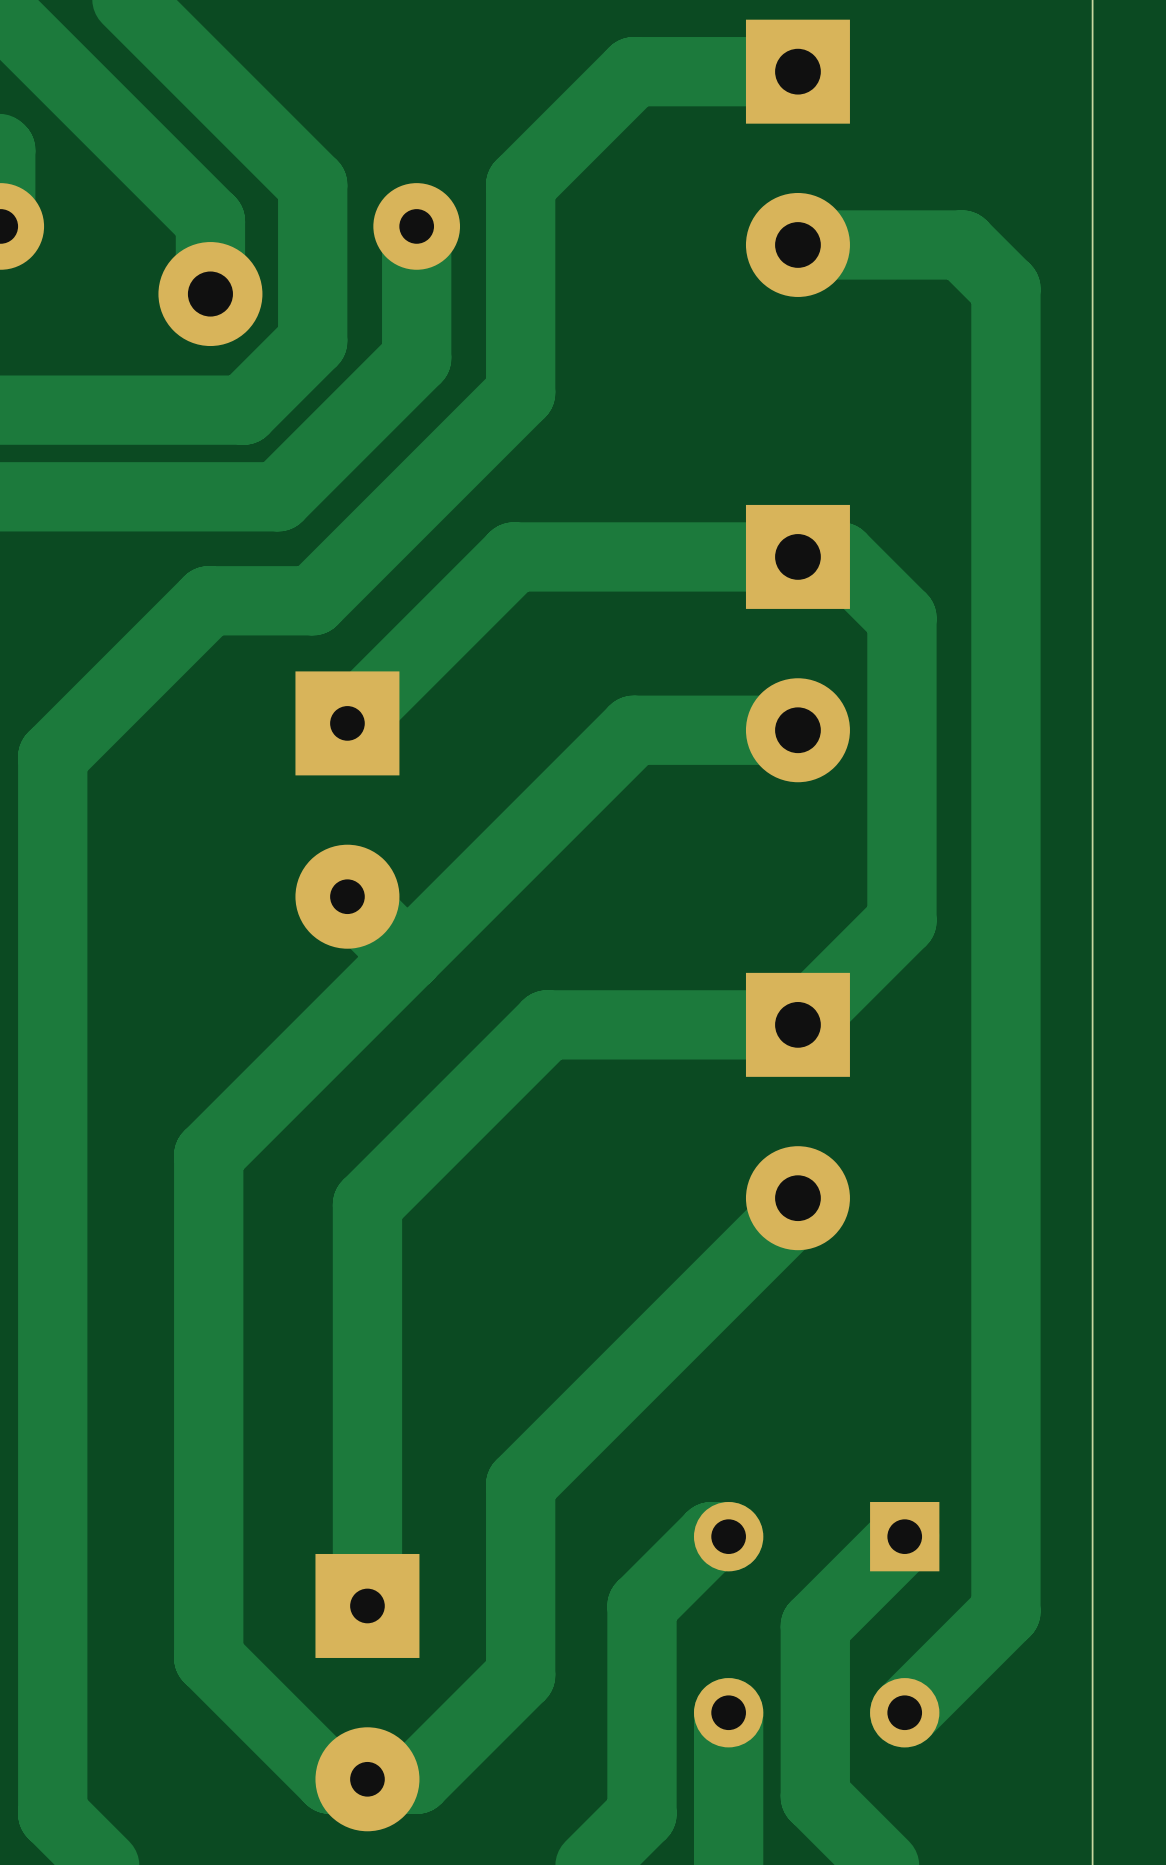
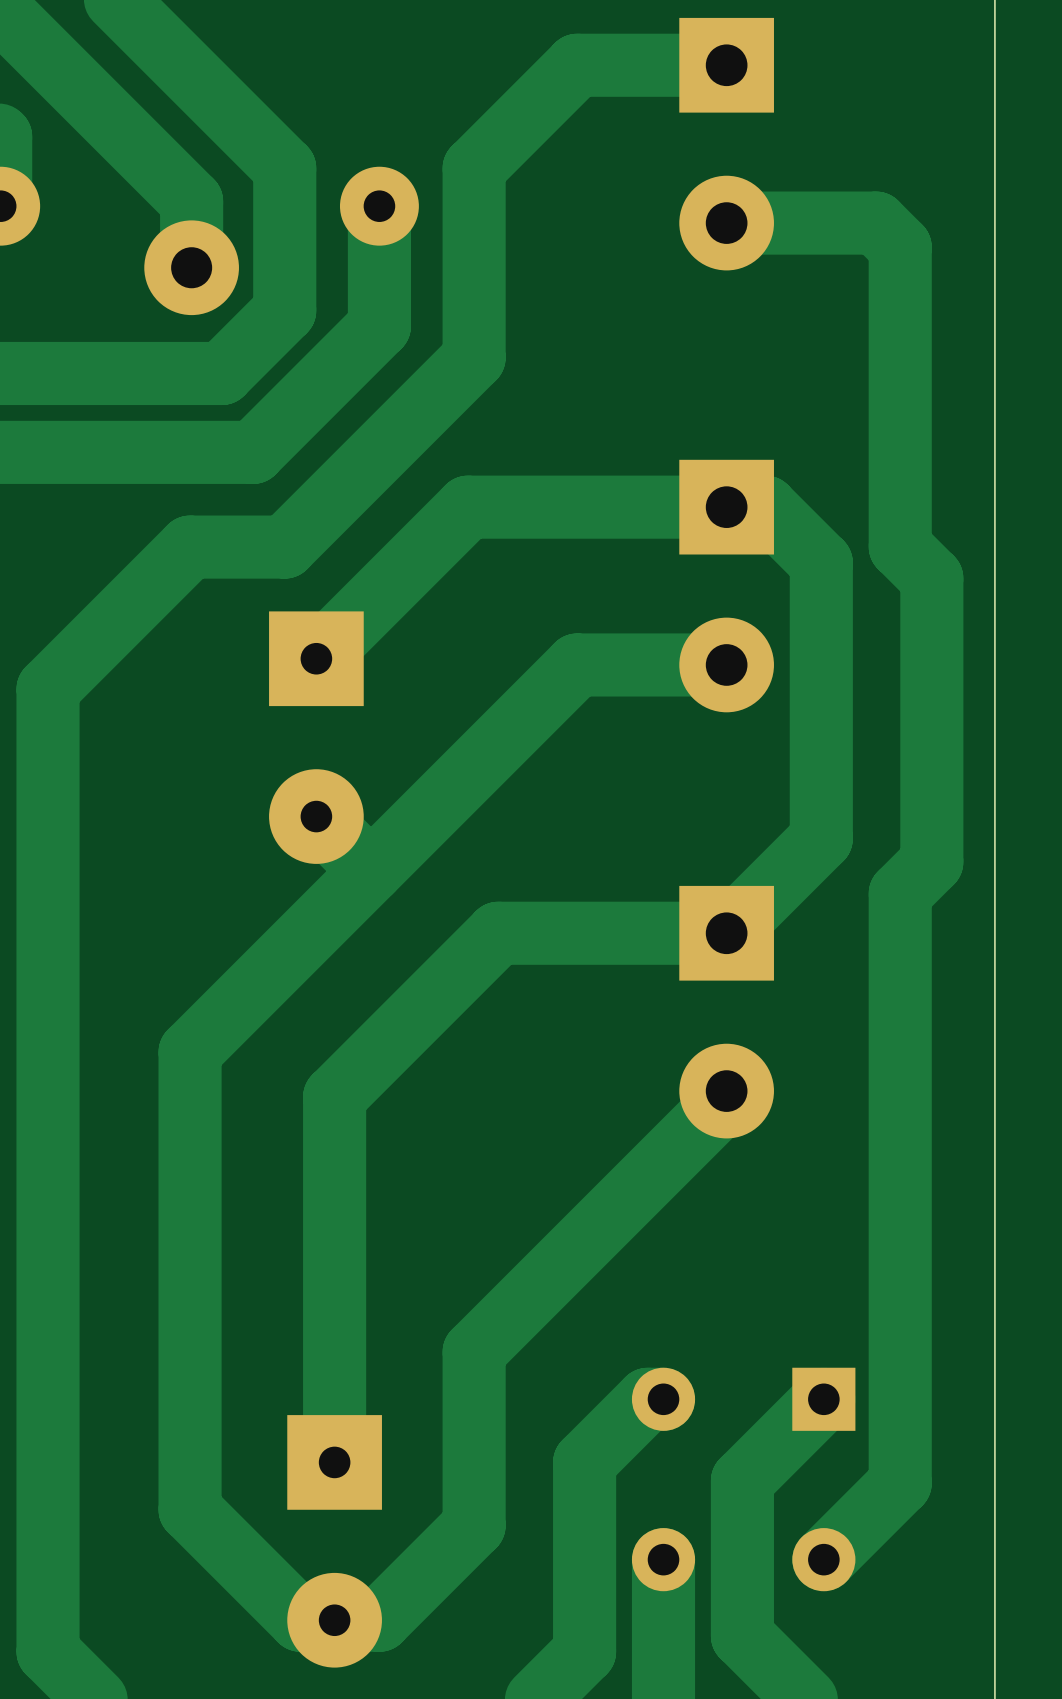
track: (988, 271) (1005, 288) (1005, 1611) (988, 1628) -> (900, 247) (900, 546) (931, 578) (931, 862) (900, 893) (900, 1483)

